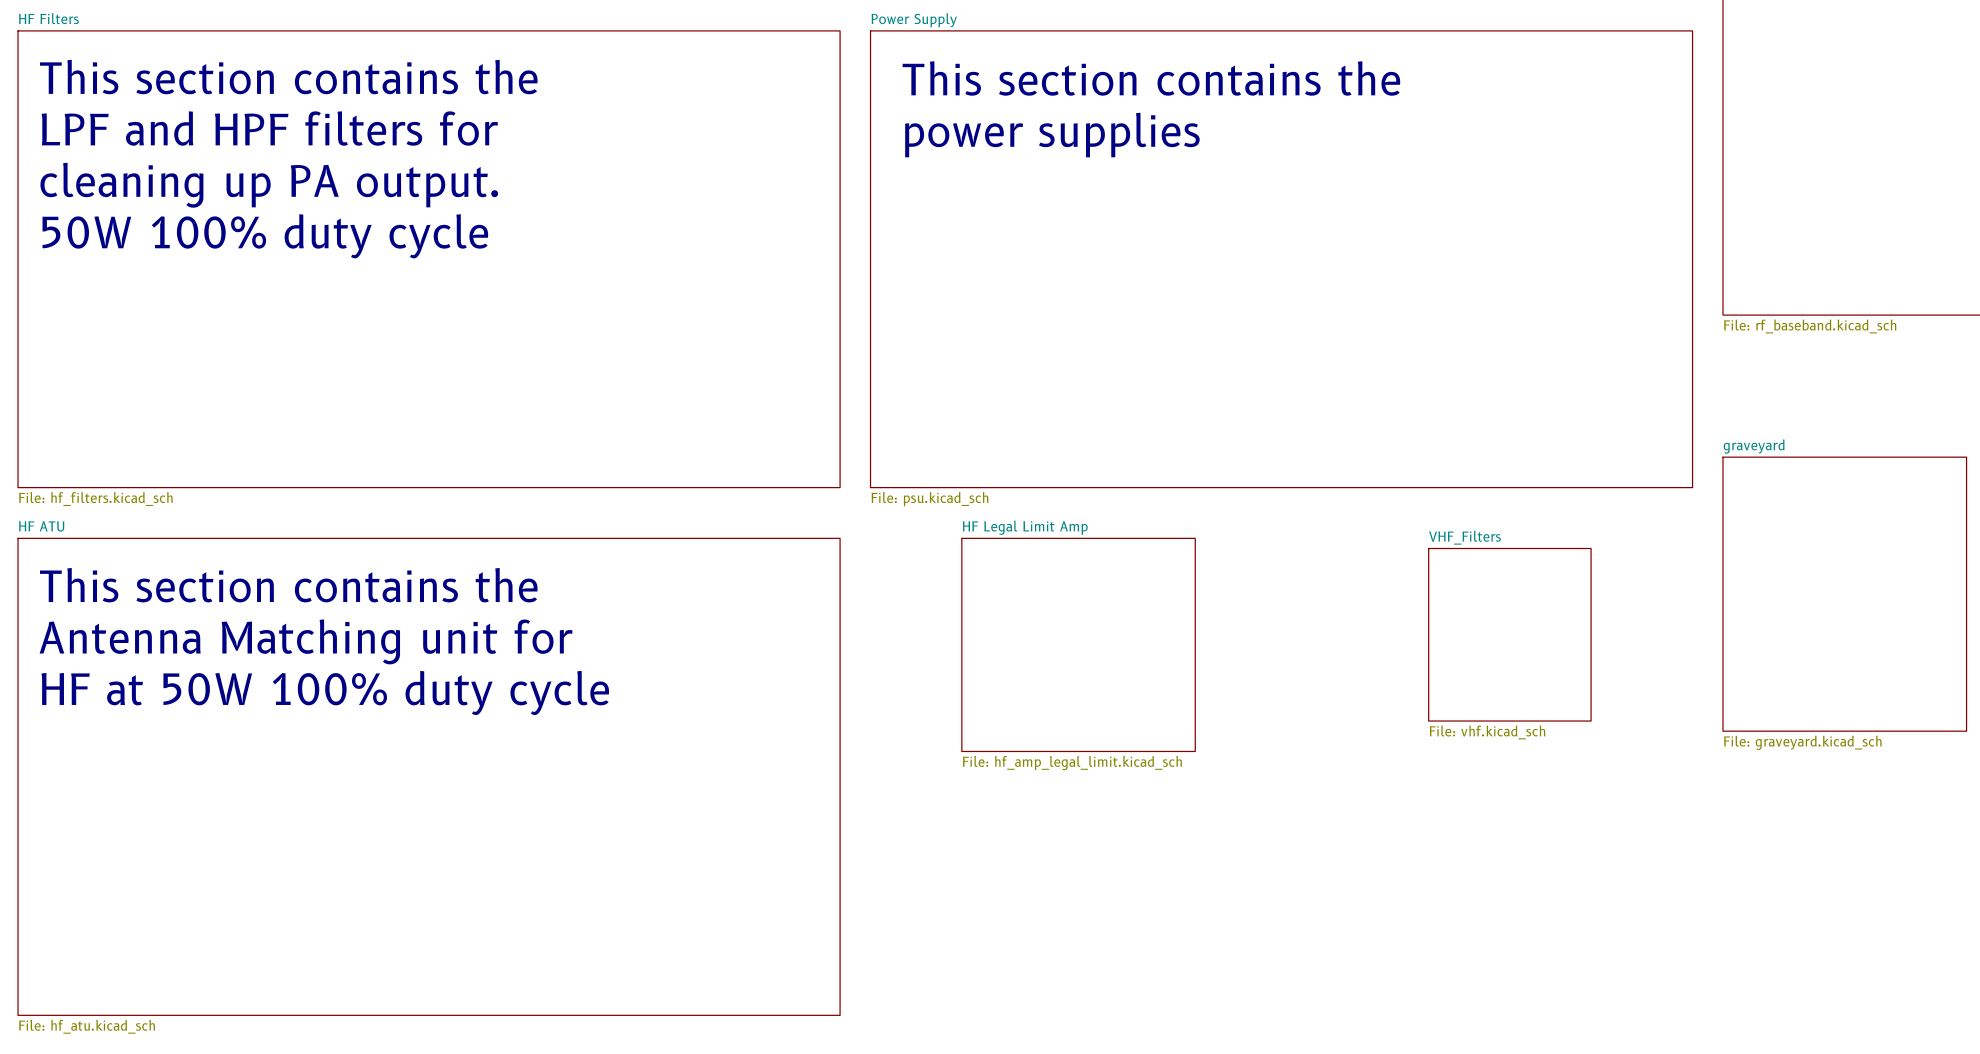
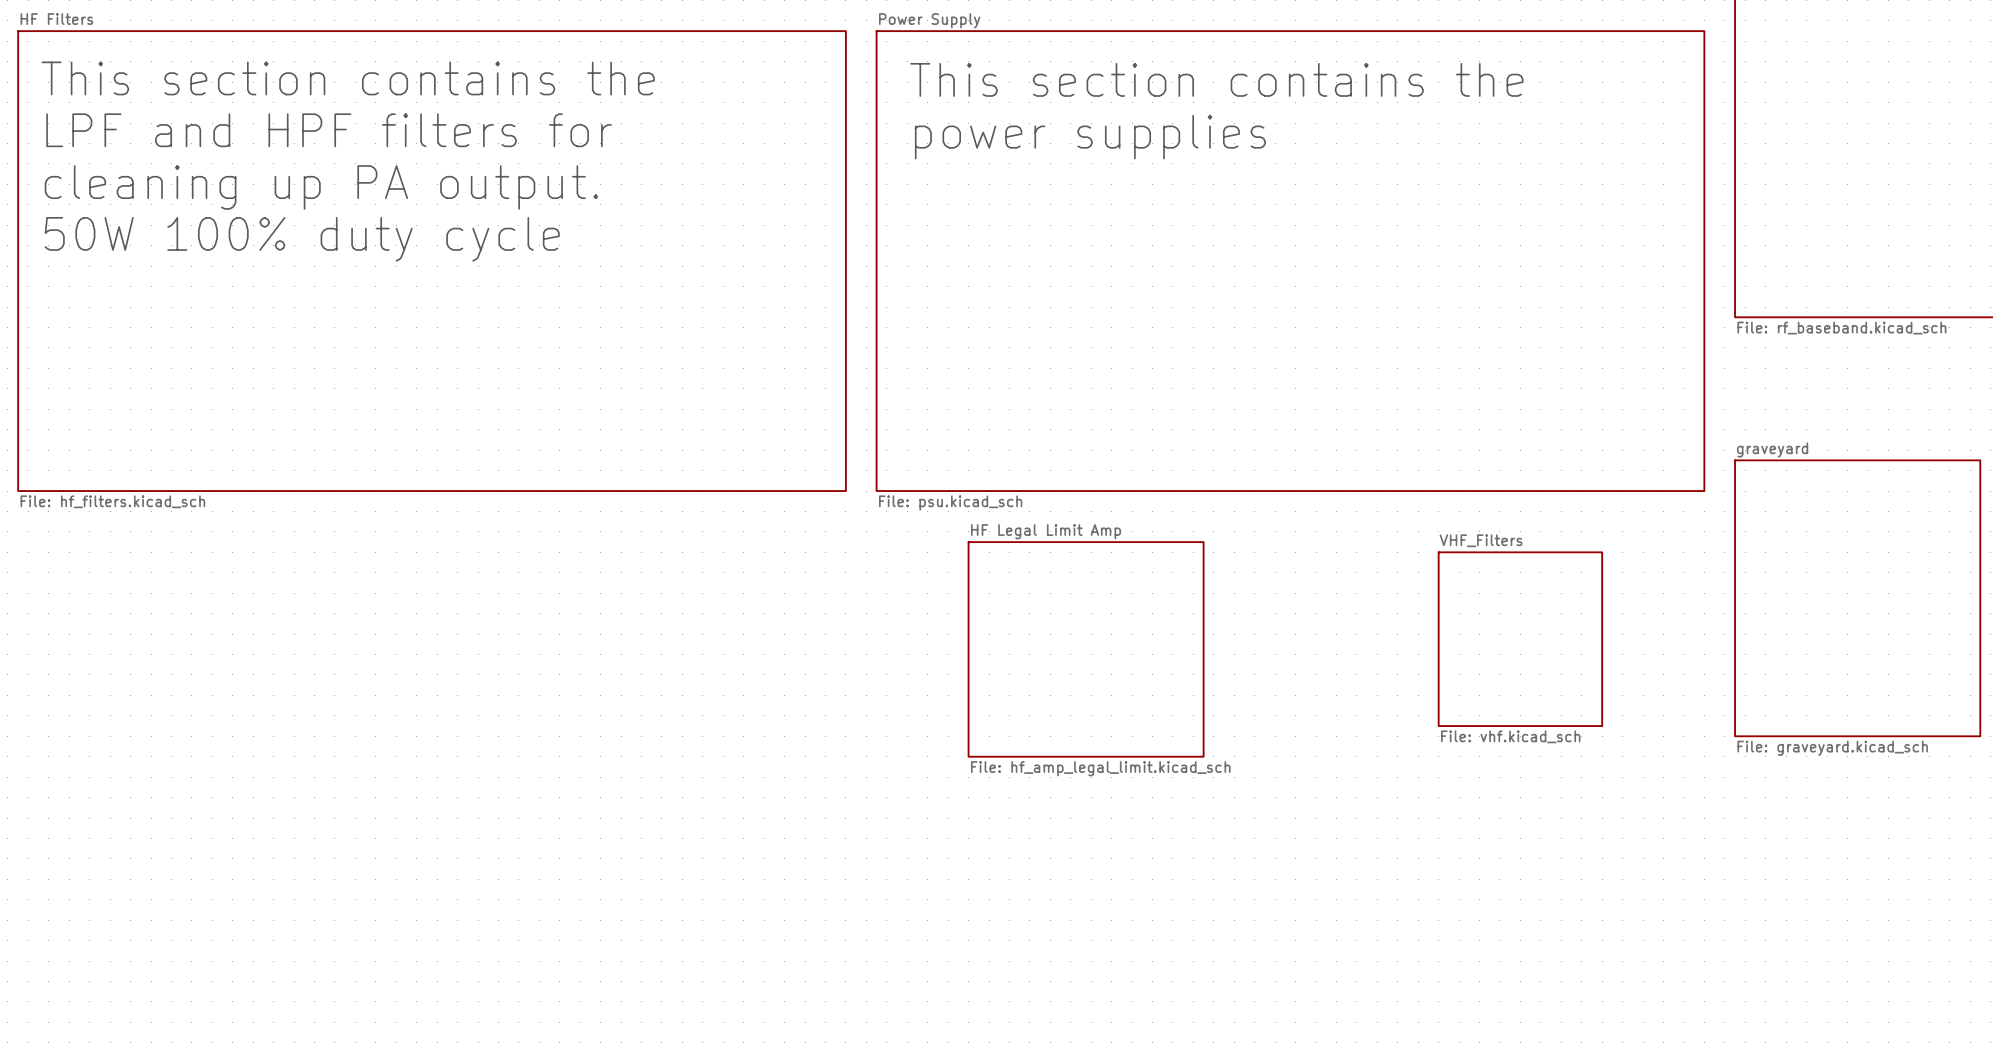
text: This section contains the (288, 585) -> none
text: Antenna Matching unit for (306, 641) -> none
text: HF at 50W 100% duty cycle (325, 692) -> none
sheet HF ATU: File: hf_atu.kicad_sch (429, 776) -> none

